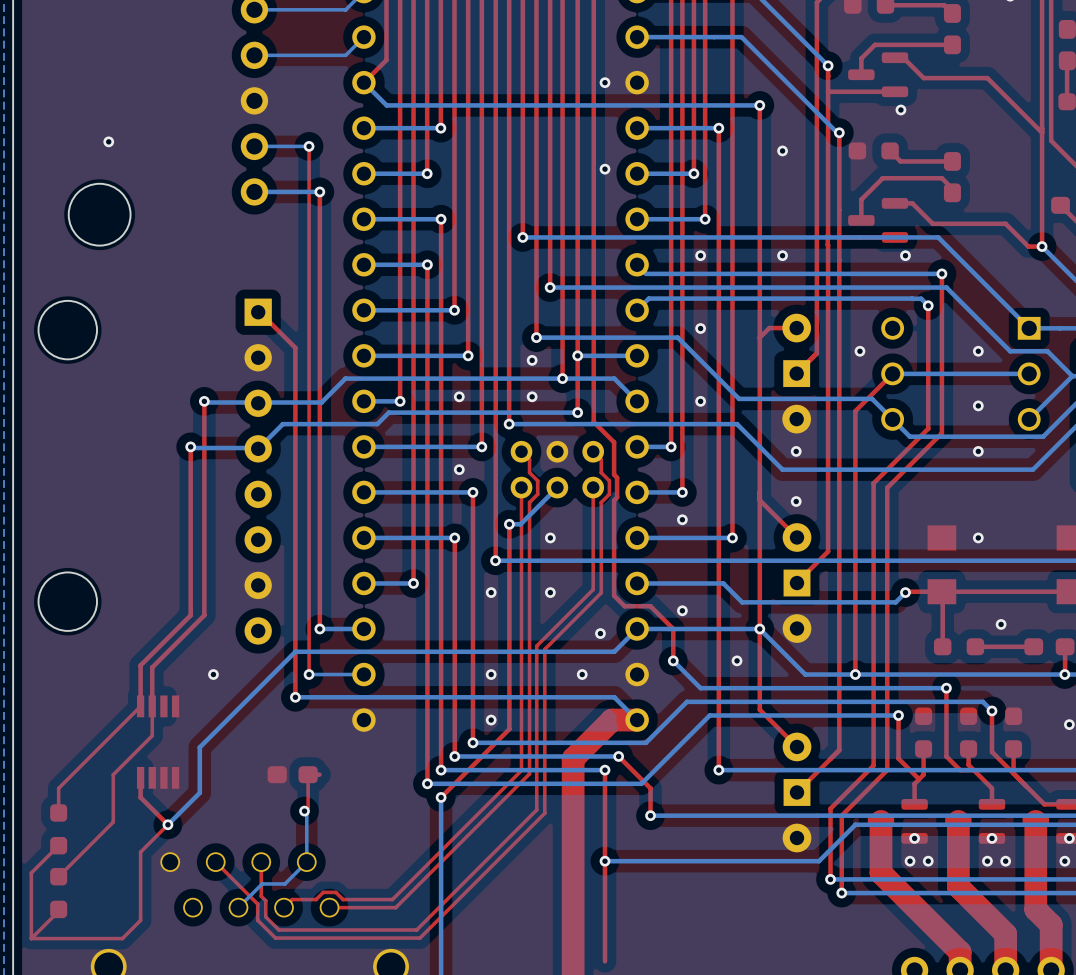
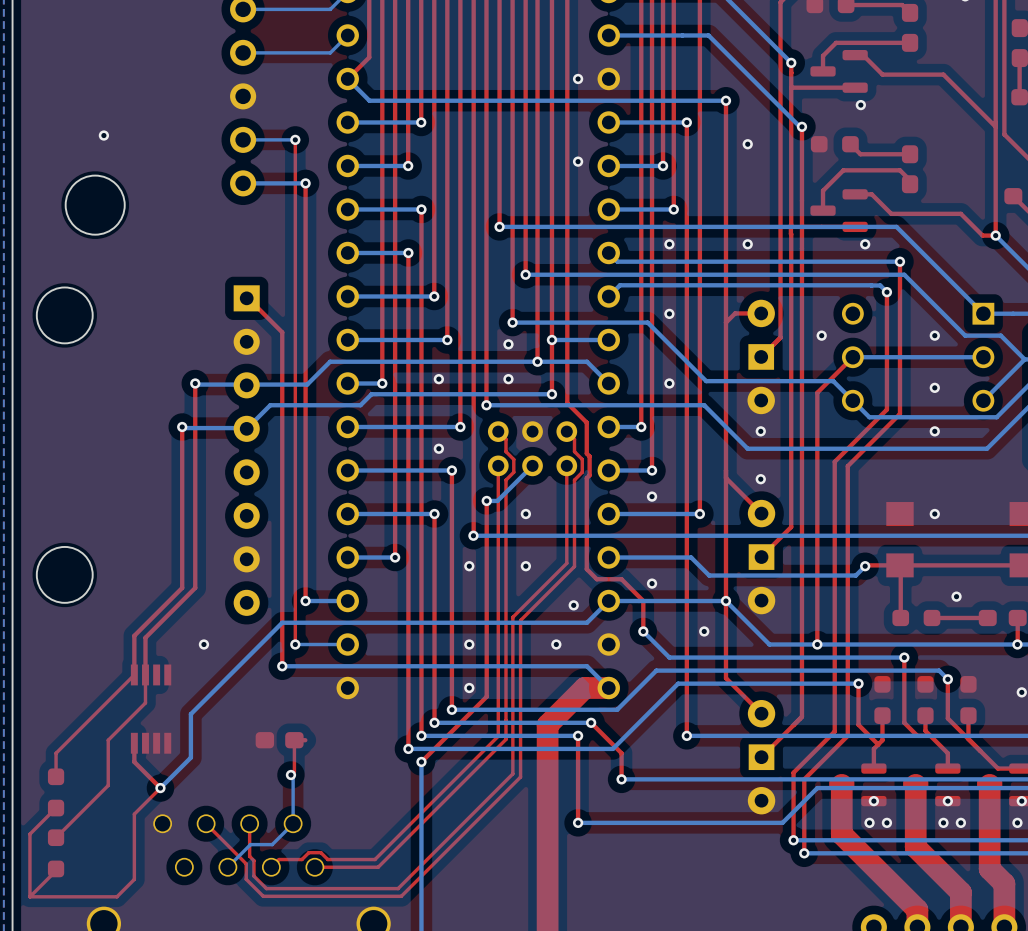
top track: (605, 861) (605, 961) -> none

